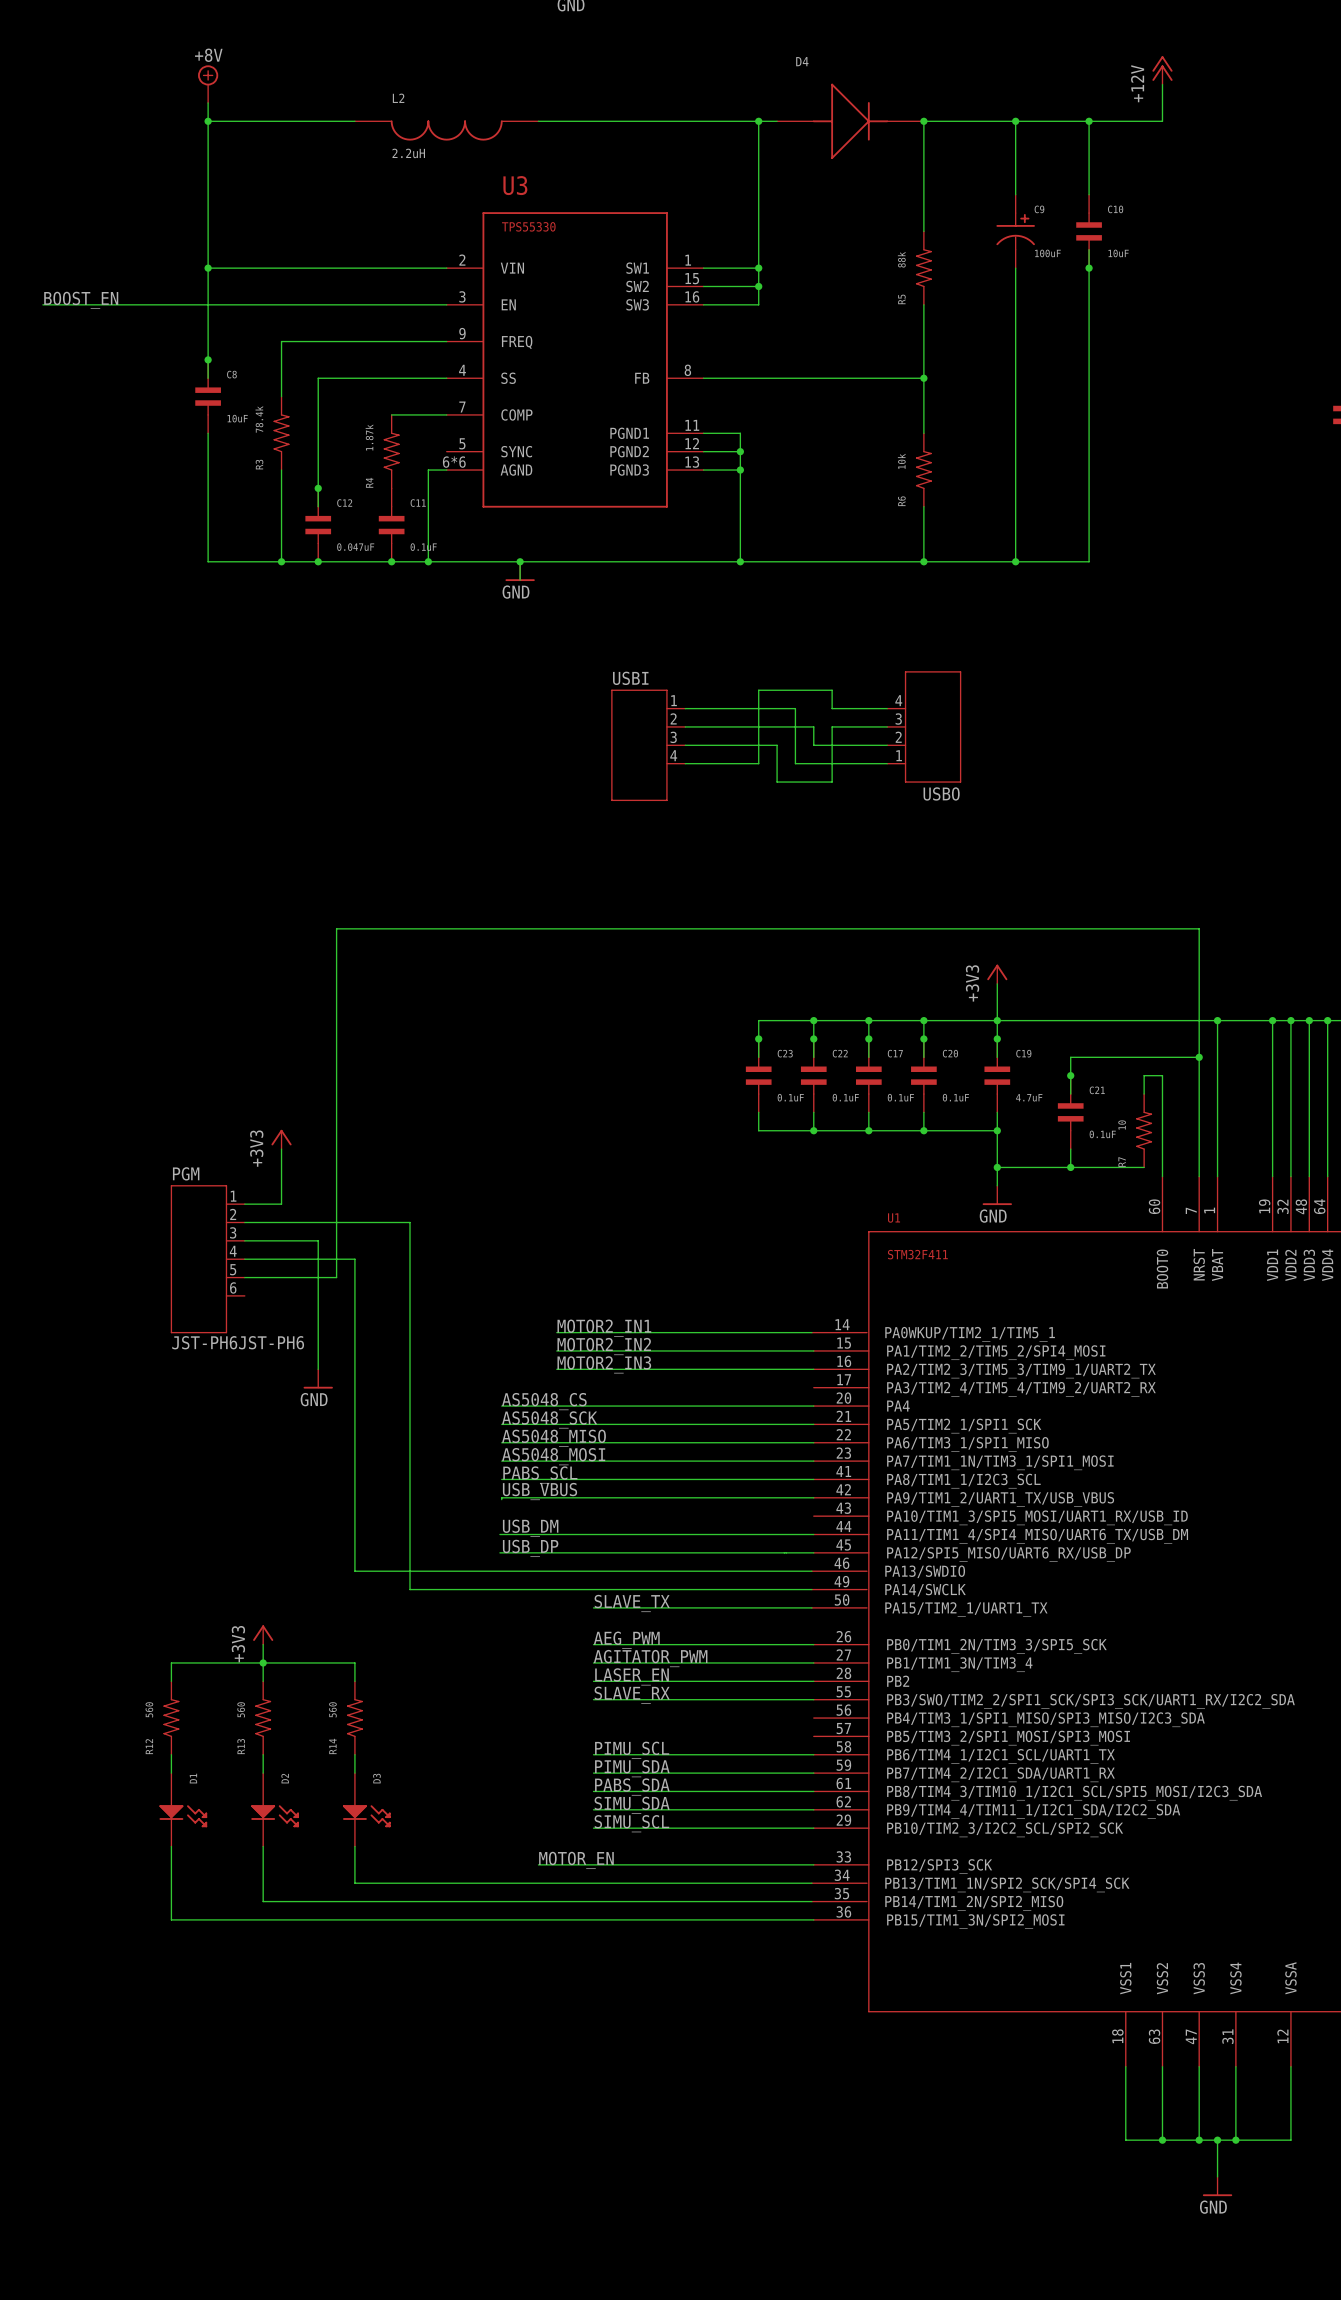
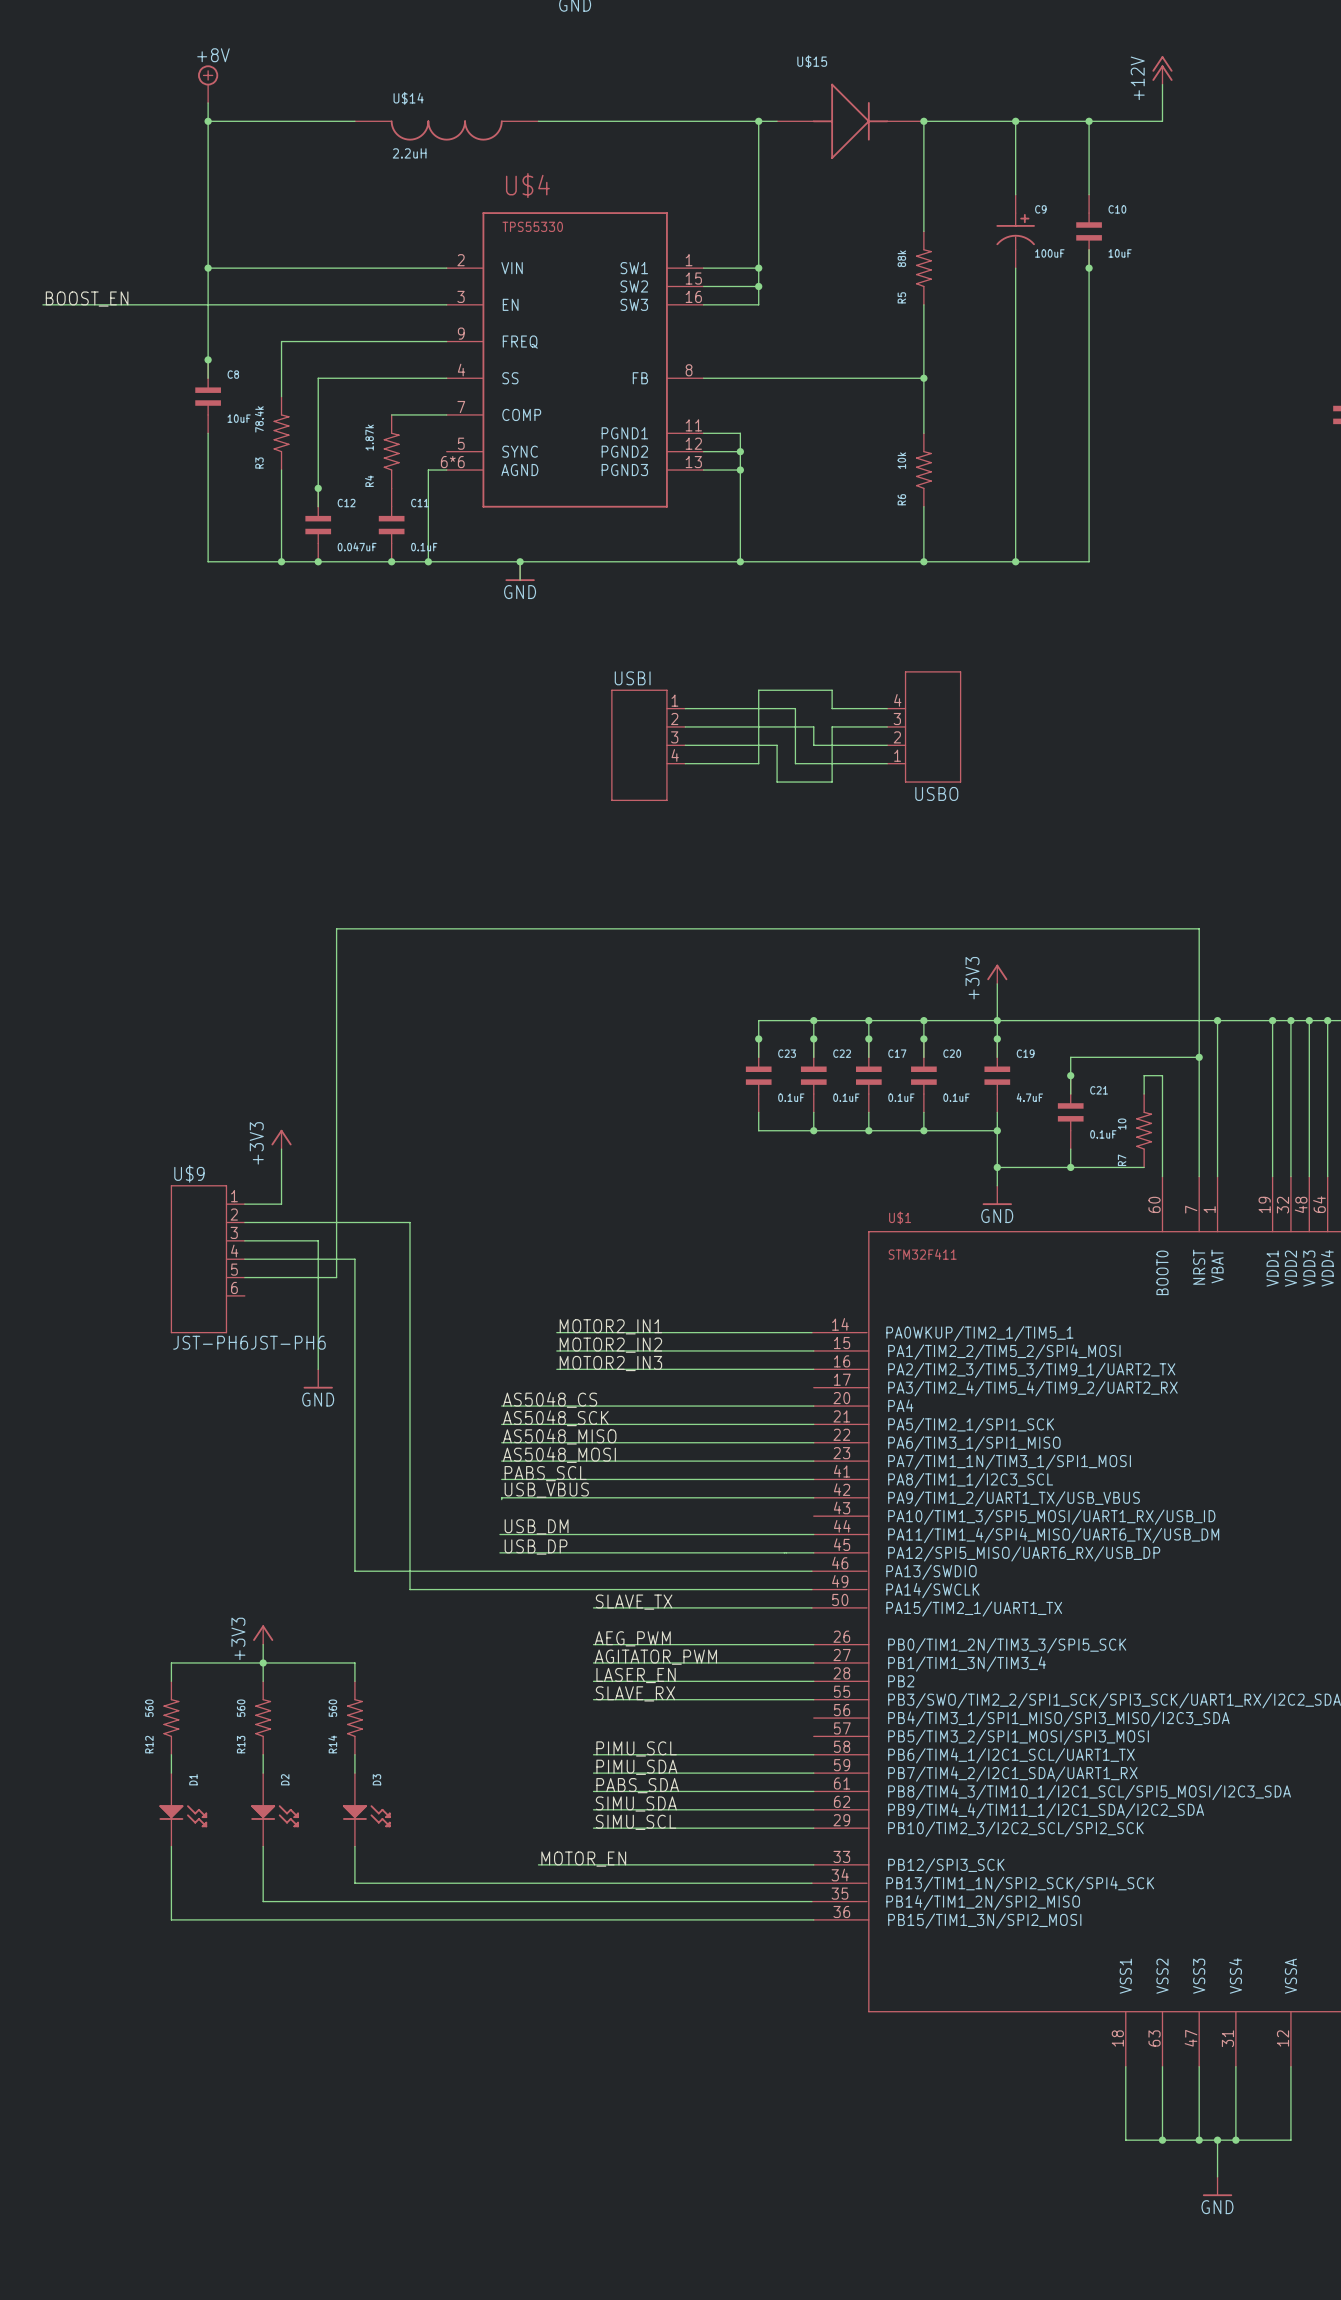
D4 name: D4 (802, 61) -> U$15 (812, 61)
L2 name: L2 (398, 98) -> U$14 (408, 98)
U3 name: U3 (515, 185) -> U$4 (527, 185)
PGM name: PGM (186, 1173) -> U$9 (189, 1173)
U1 name: U1 (894, 1218) -> U$1 (900, 1217)

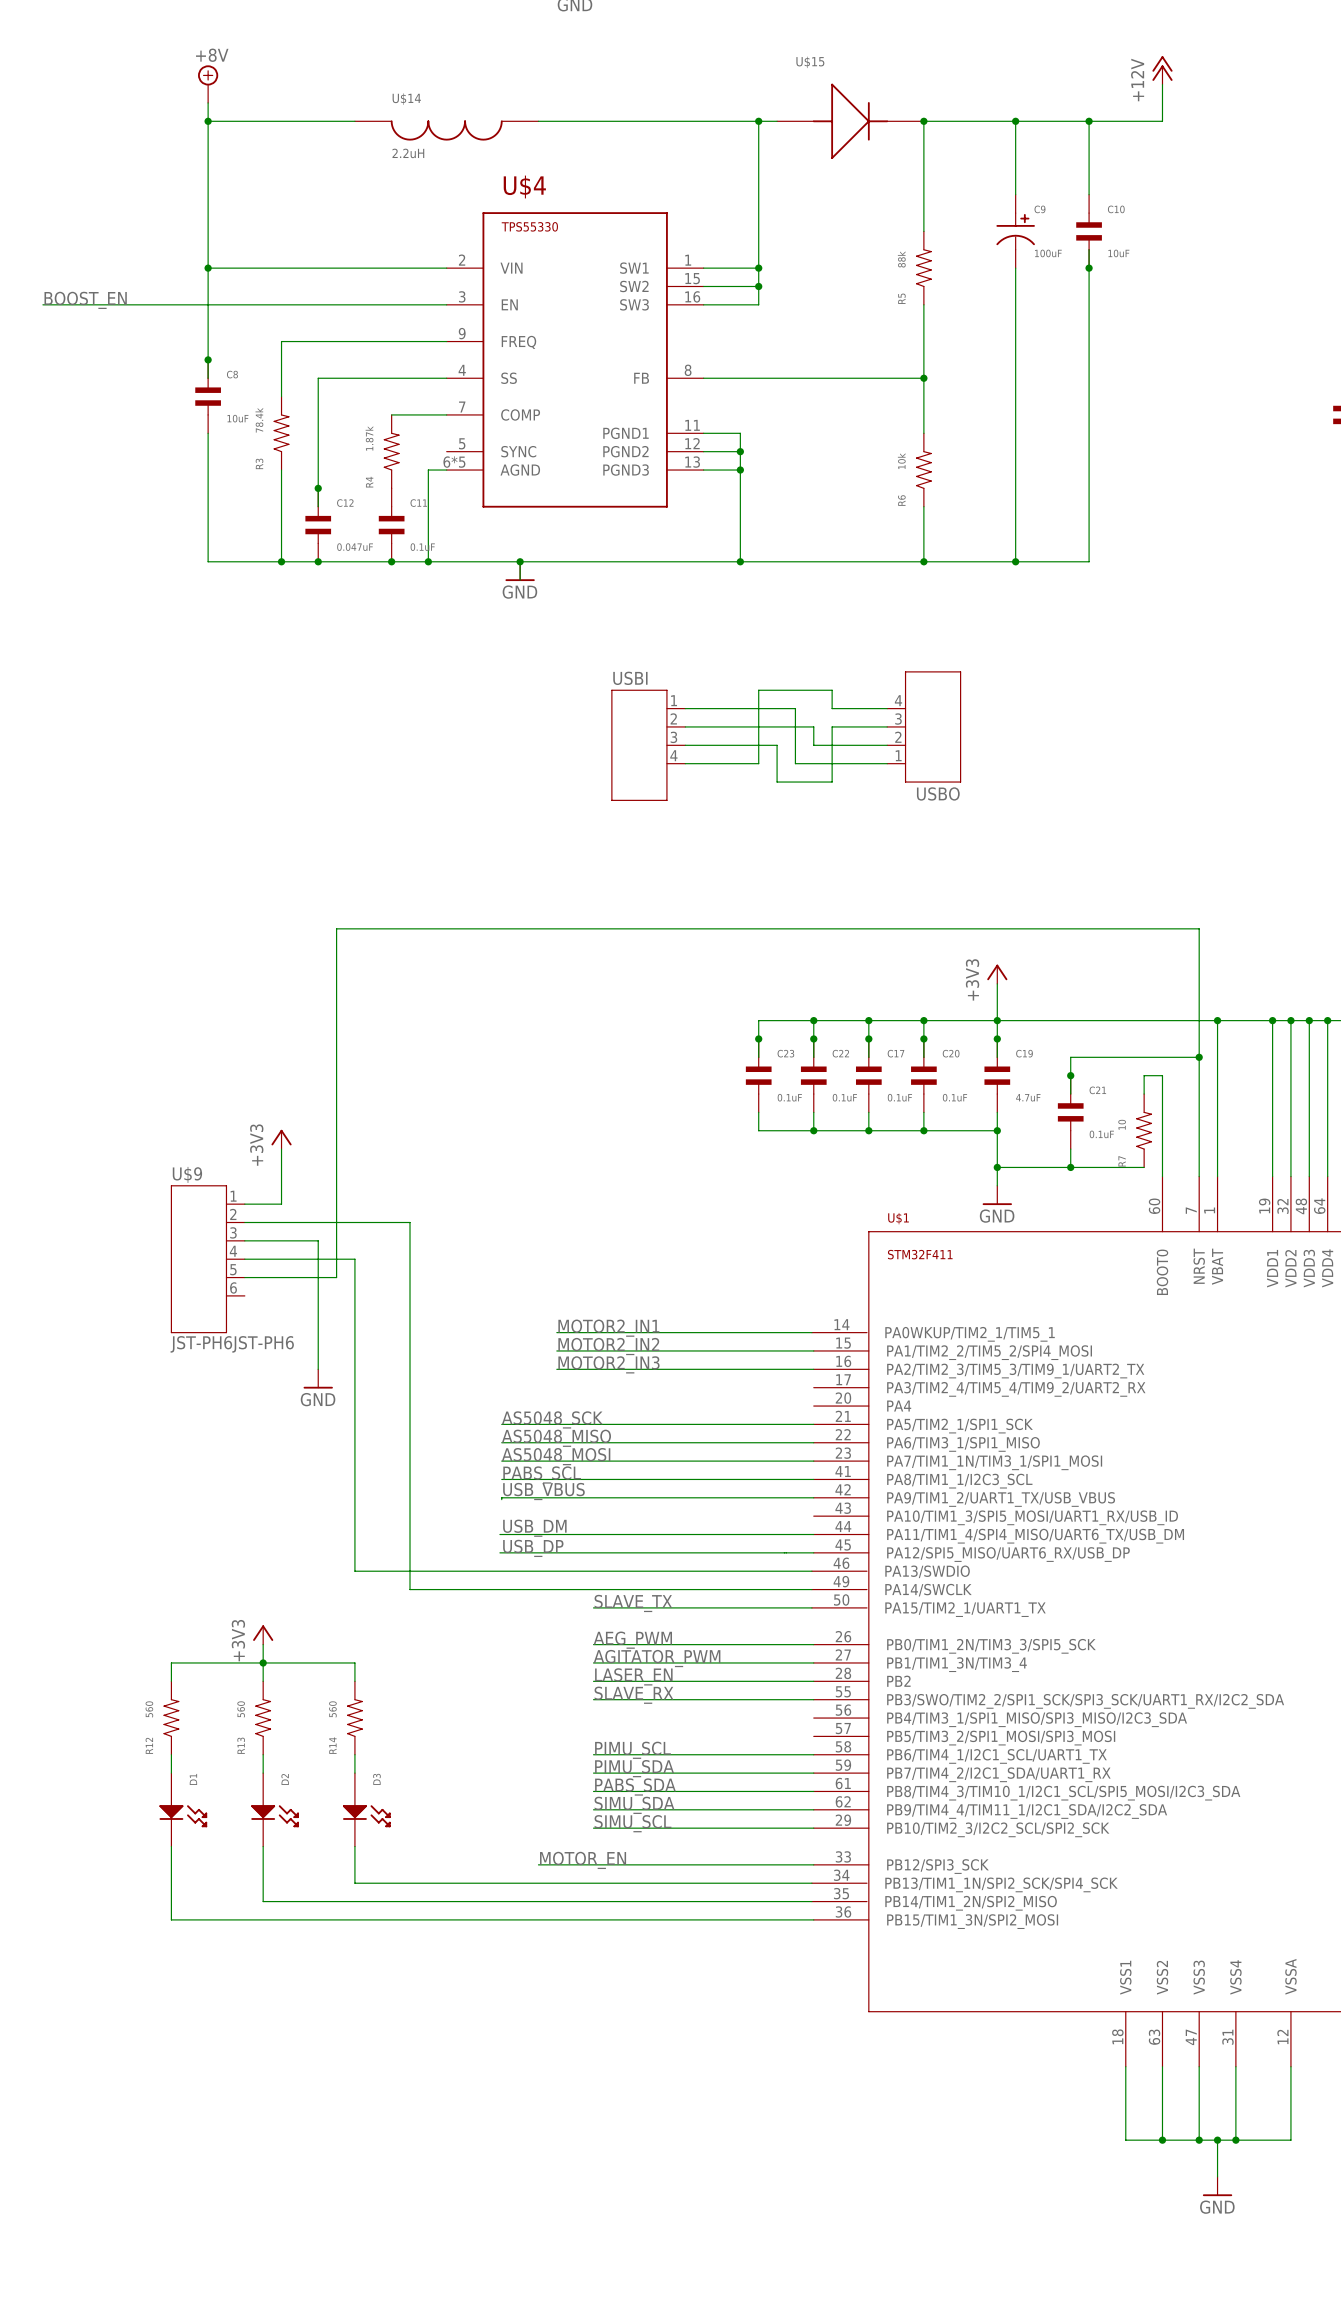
U$4 pin number: 6*6 (452, 462) -> 6*5 (454, 462)
label: AS5048_CS (550, 1399) -> none
wire: (501, 1406) (813, 1406) -> none

